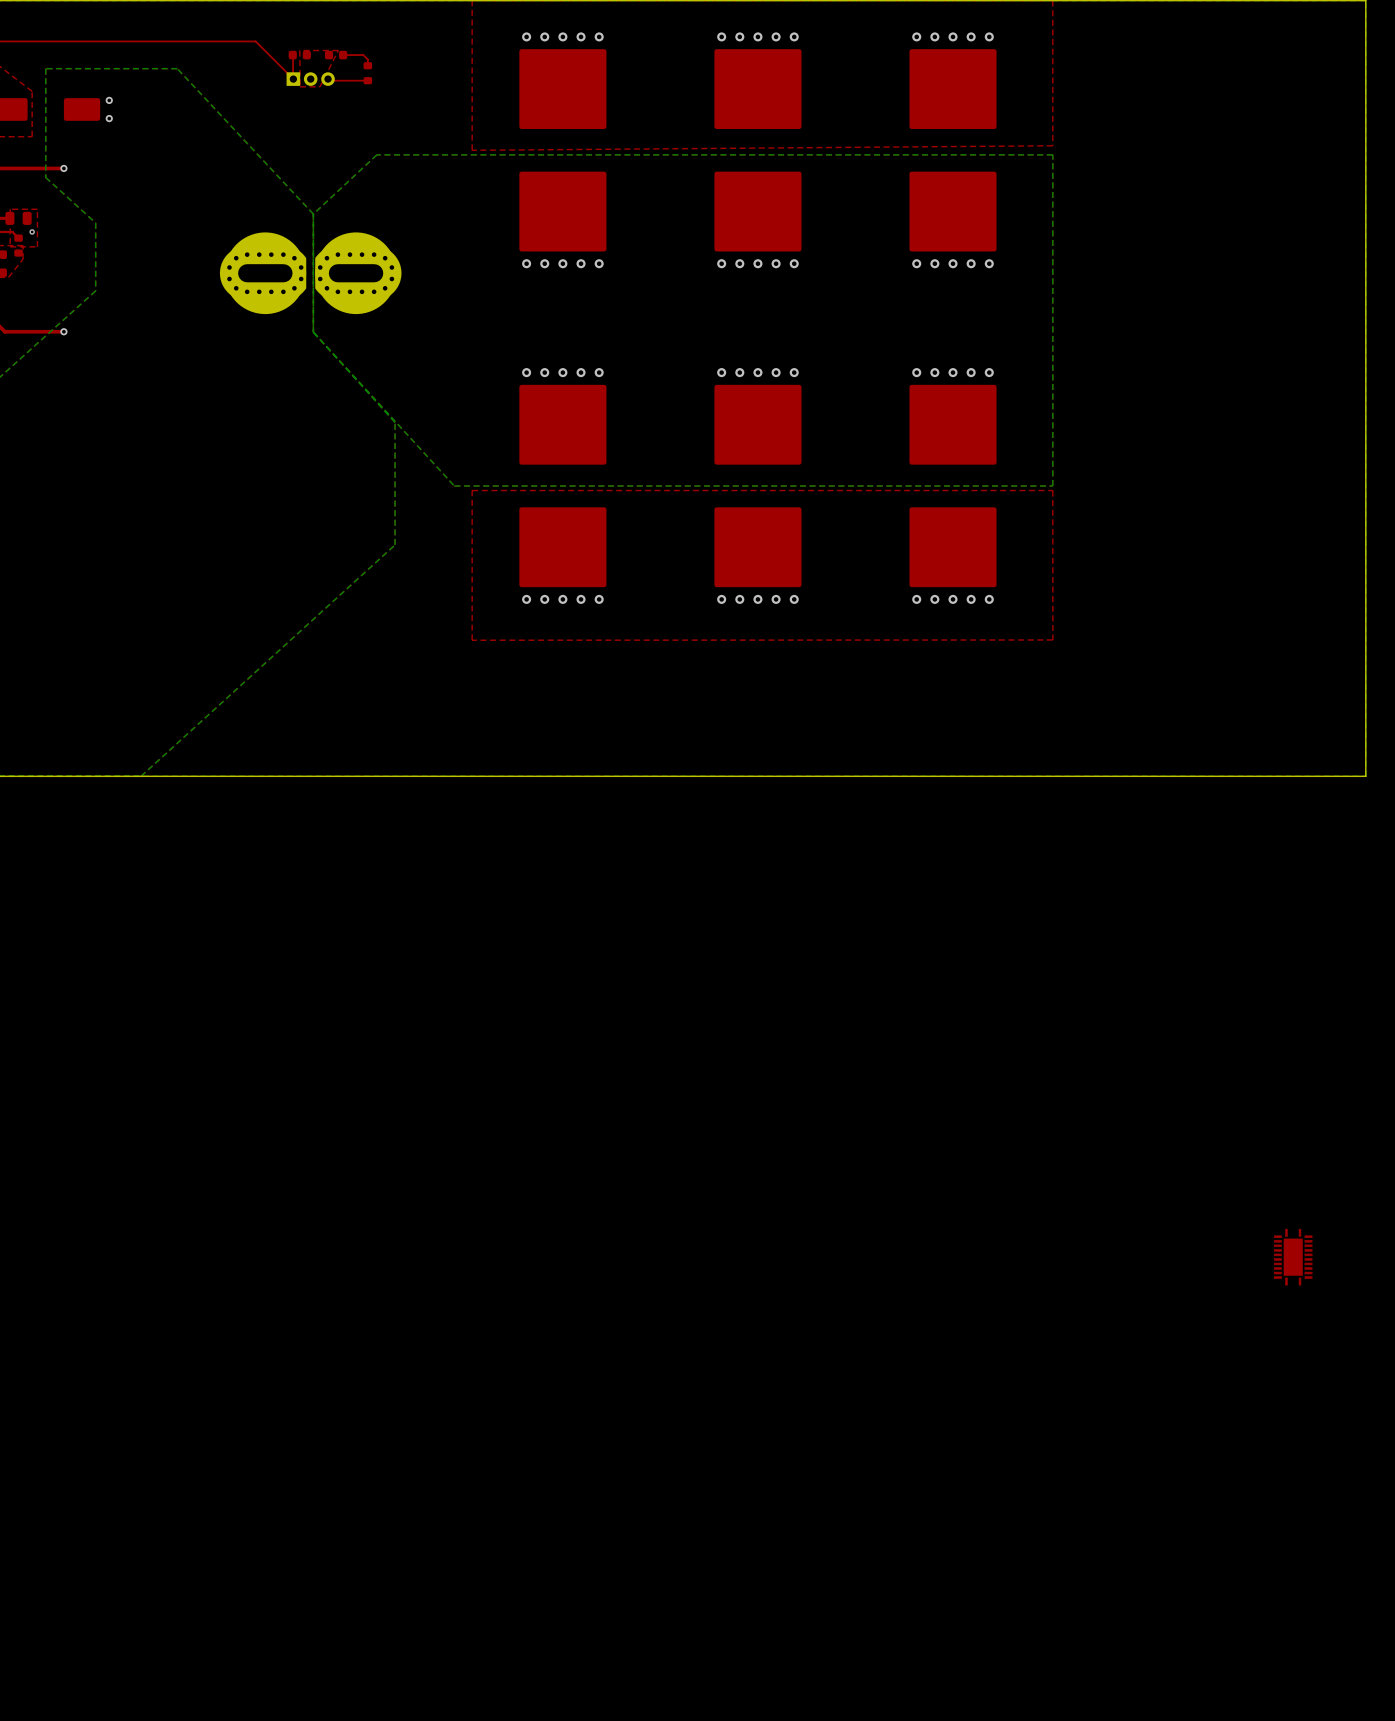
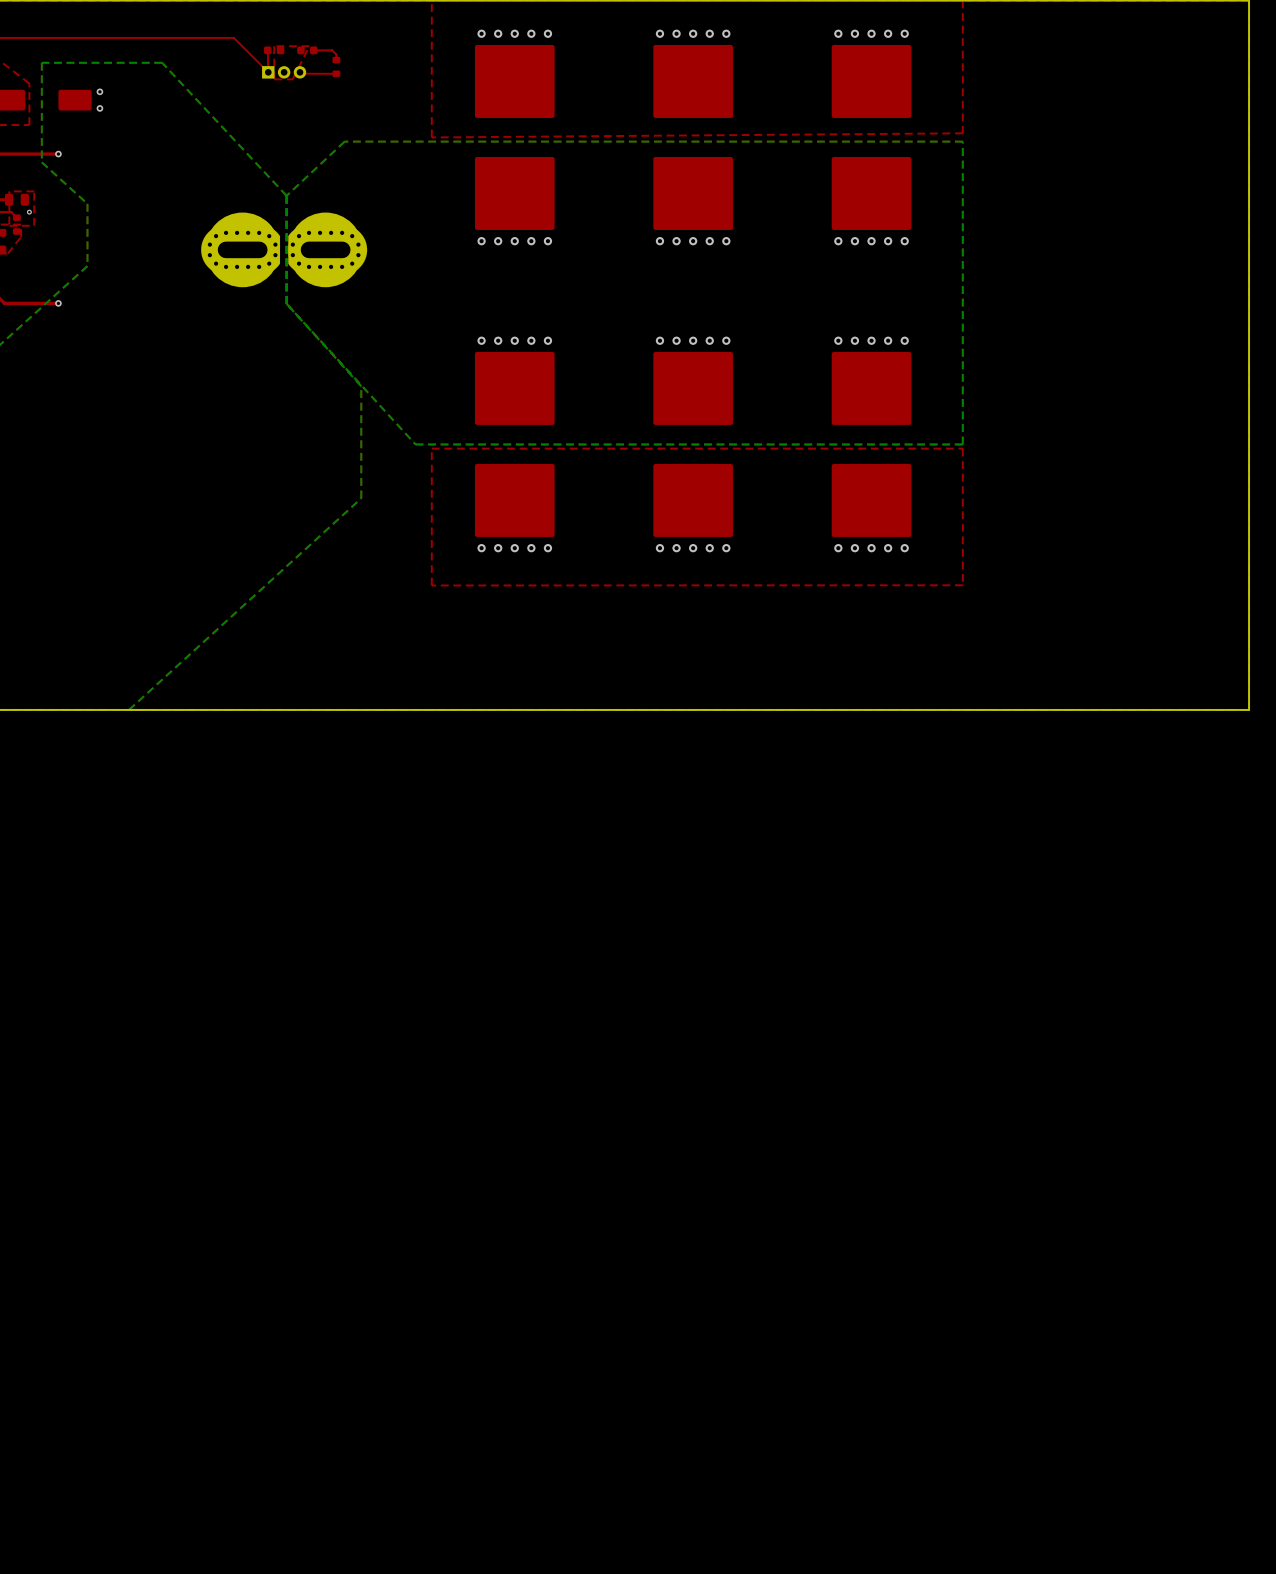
part: (1293, 1257) -> none

